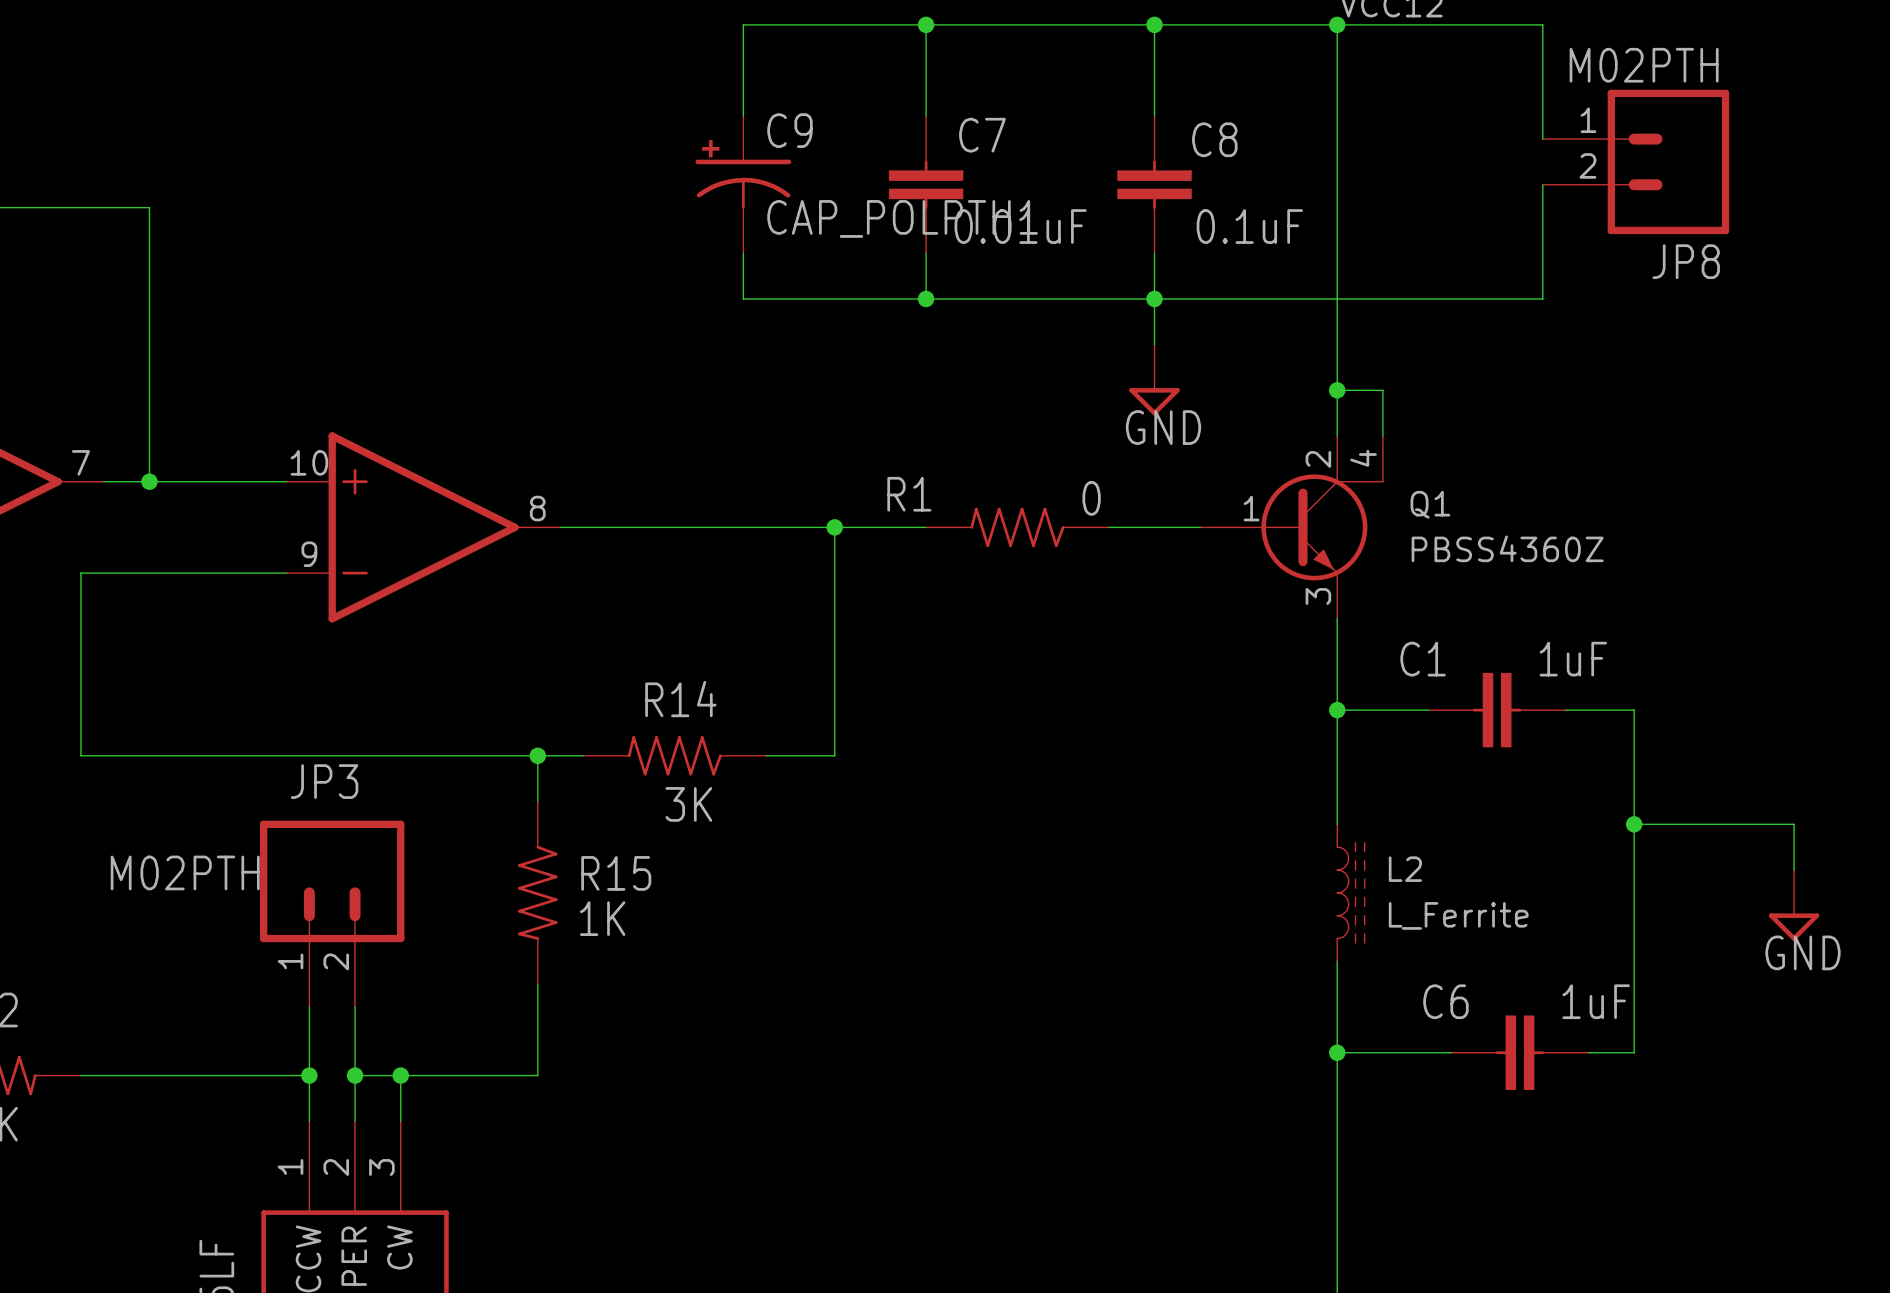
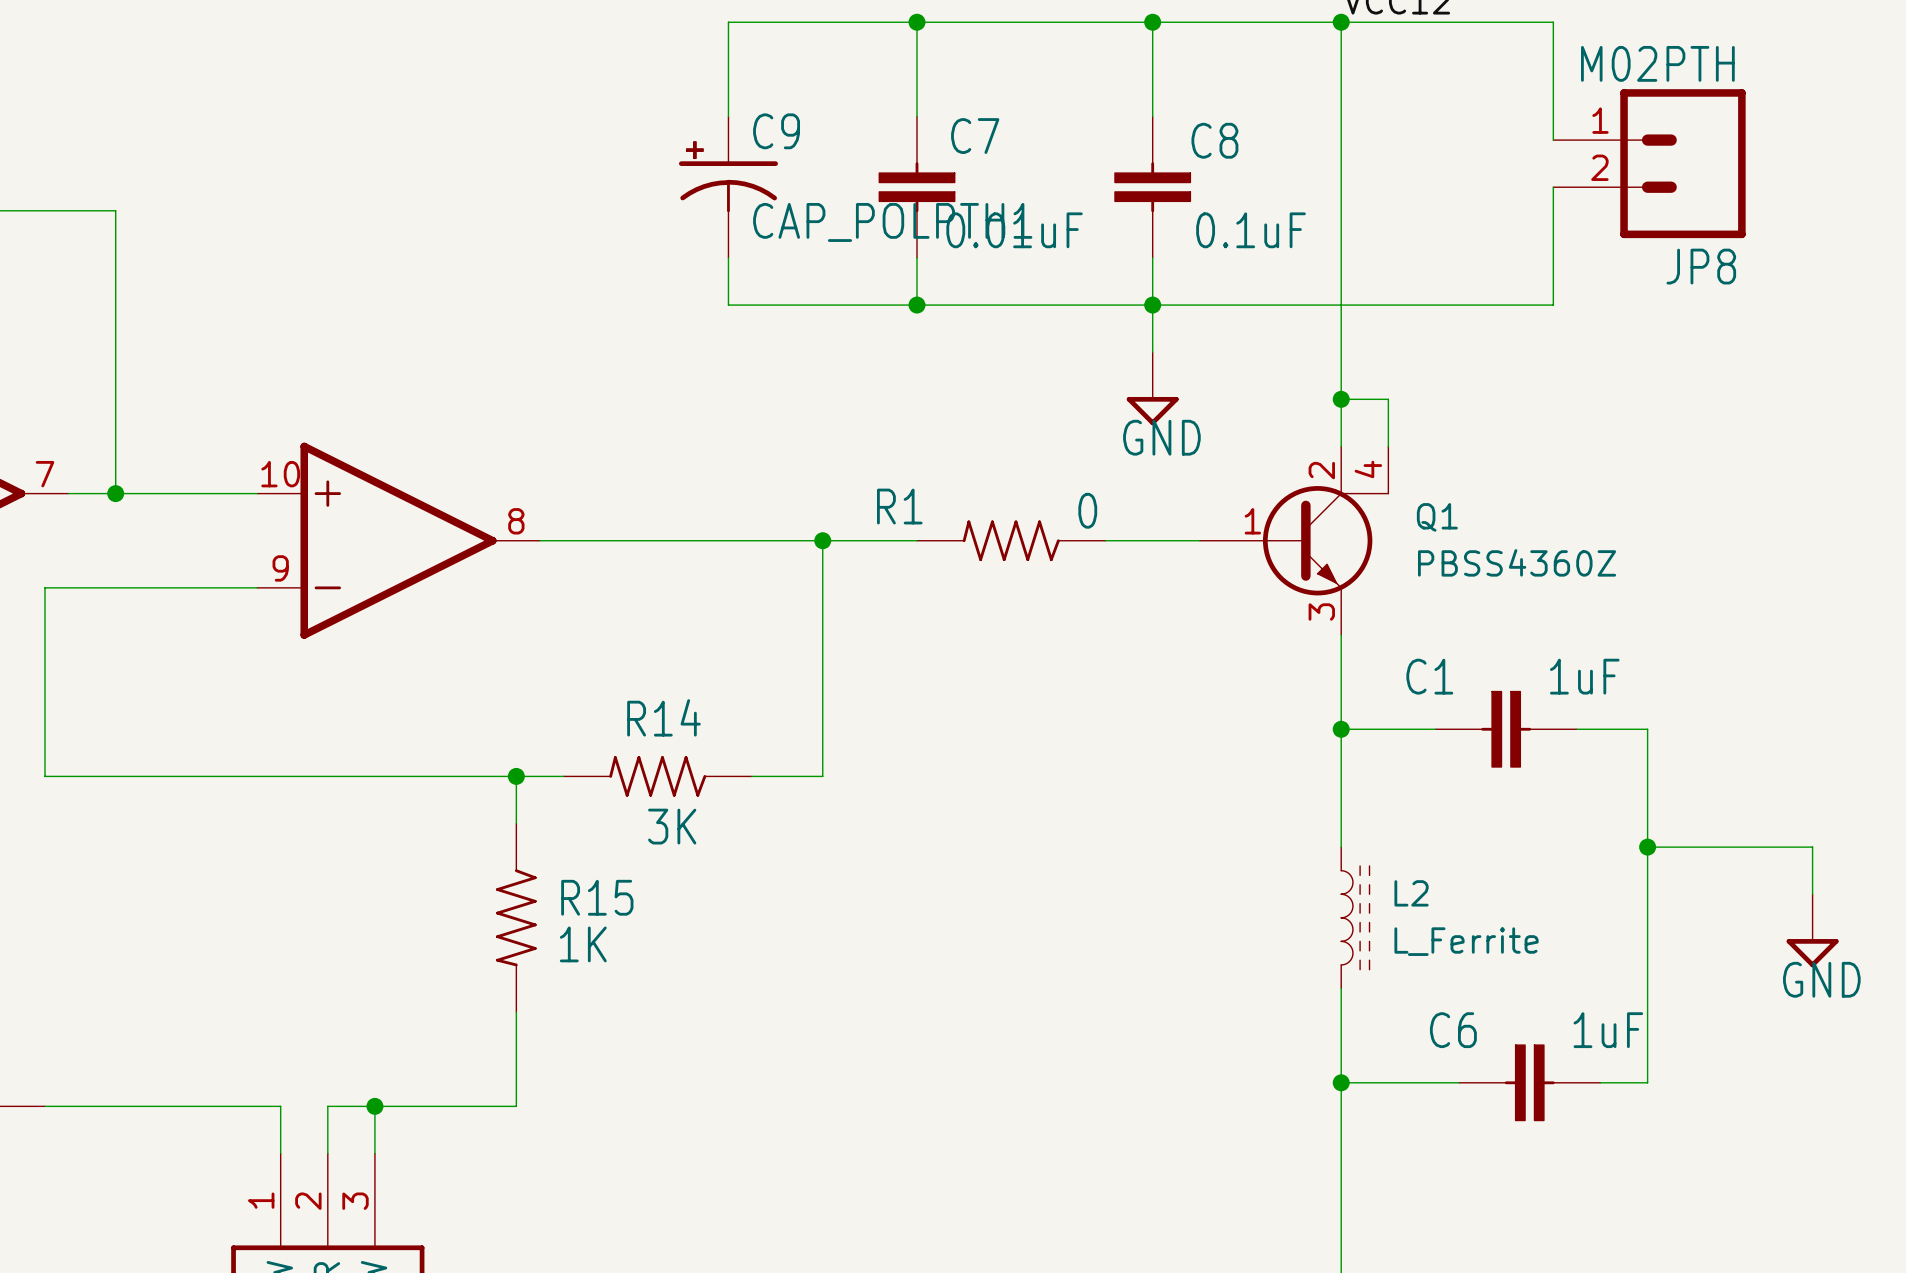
JP3: M02PTH (332, 913) -> none
wire: (309, 1007) (309, 1075) -> none
wire: (355, 1007) (355, 1075) -> none
junction: (309, 1075) -> none
junction: (355, 1075) -> none

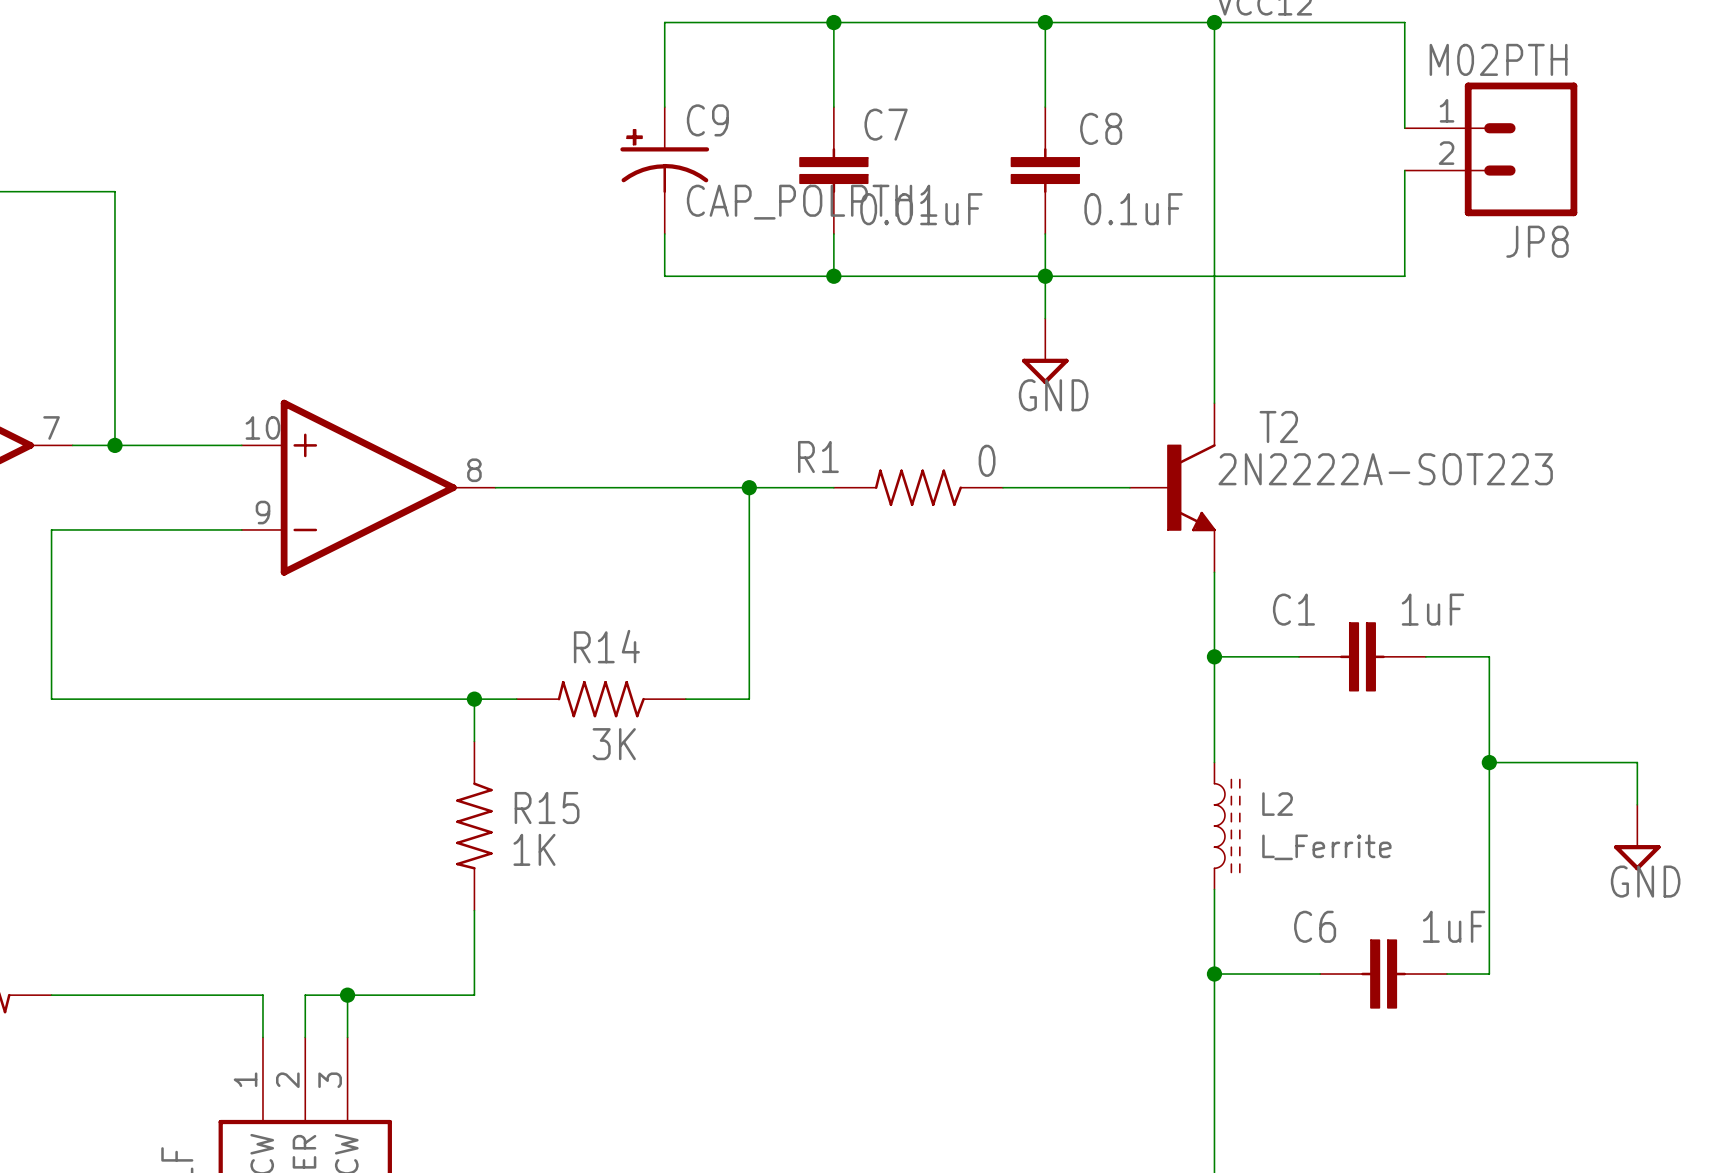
wire: (1341, 399) (1388, 399) (1388, 446) -> none
junction: (1341, 399) -> none
Q1: PBSS4360Z (1294, 540) -> none
T2: none -> 2N2222A-SOT223 (1172, 487)

